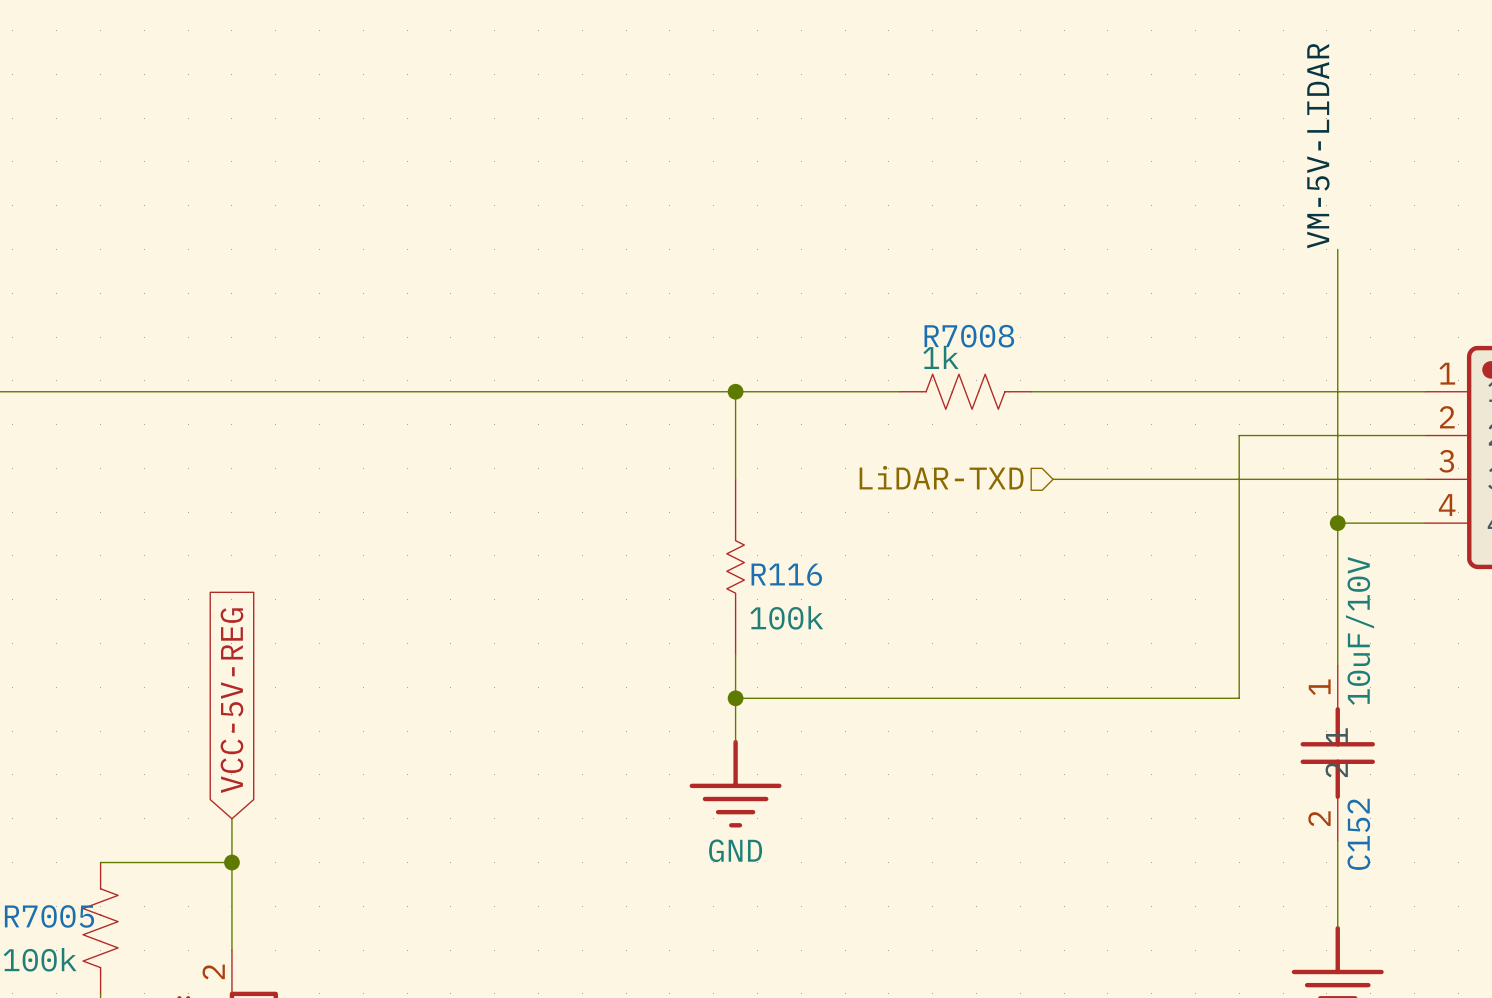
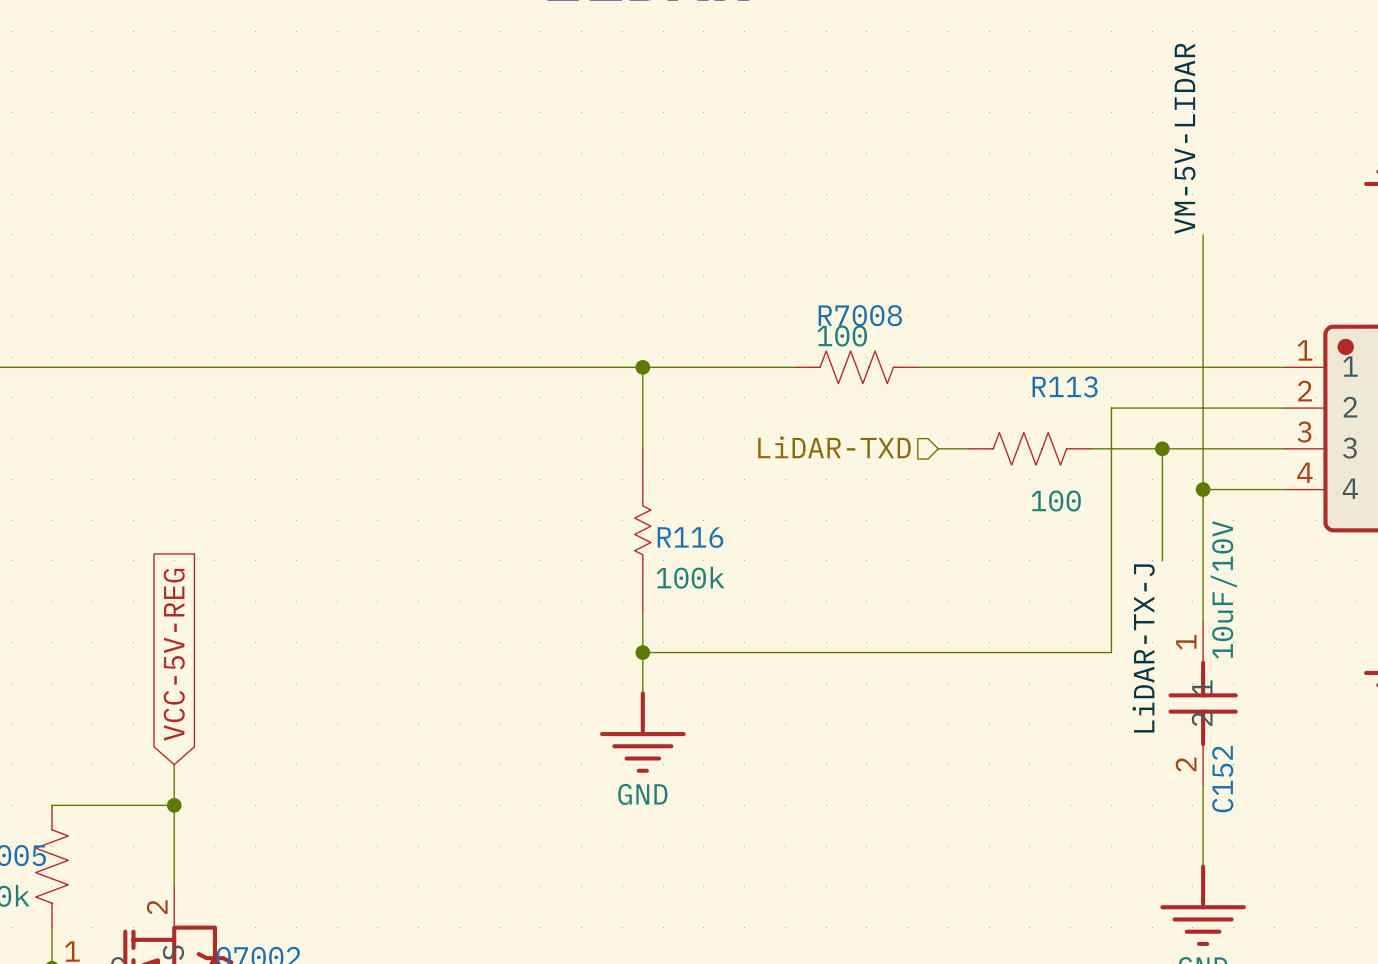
R7008 value: 1k (940, 357) -> 100 (842, 336)
wire: (1085, 479) (1217, 479) -> none
R113: none -> 100 (1029, 448)
wire: none -> (1162, 448) (1162, 560)
junction: none -> (1162, 448)
label: none -> LiDAR-TX-J (1143, 648)

